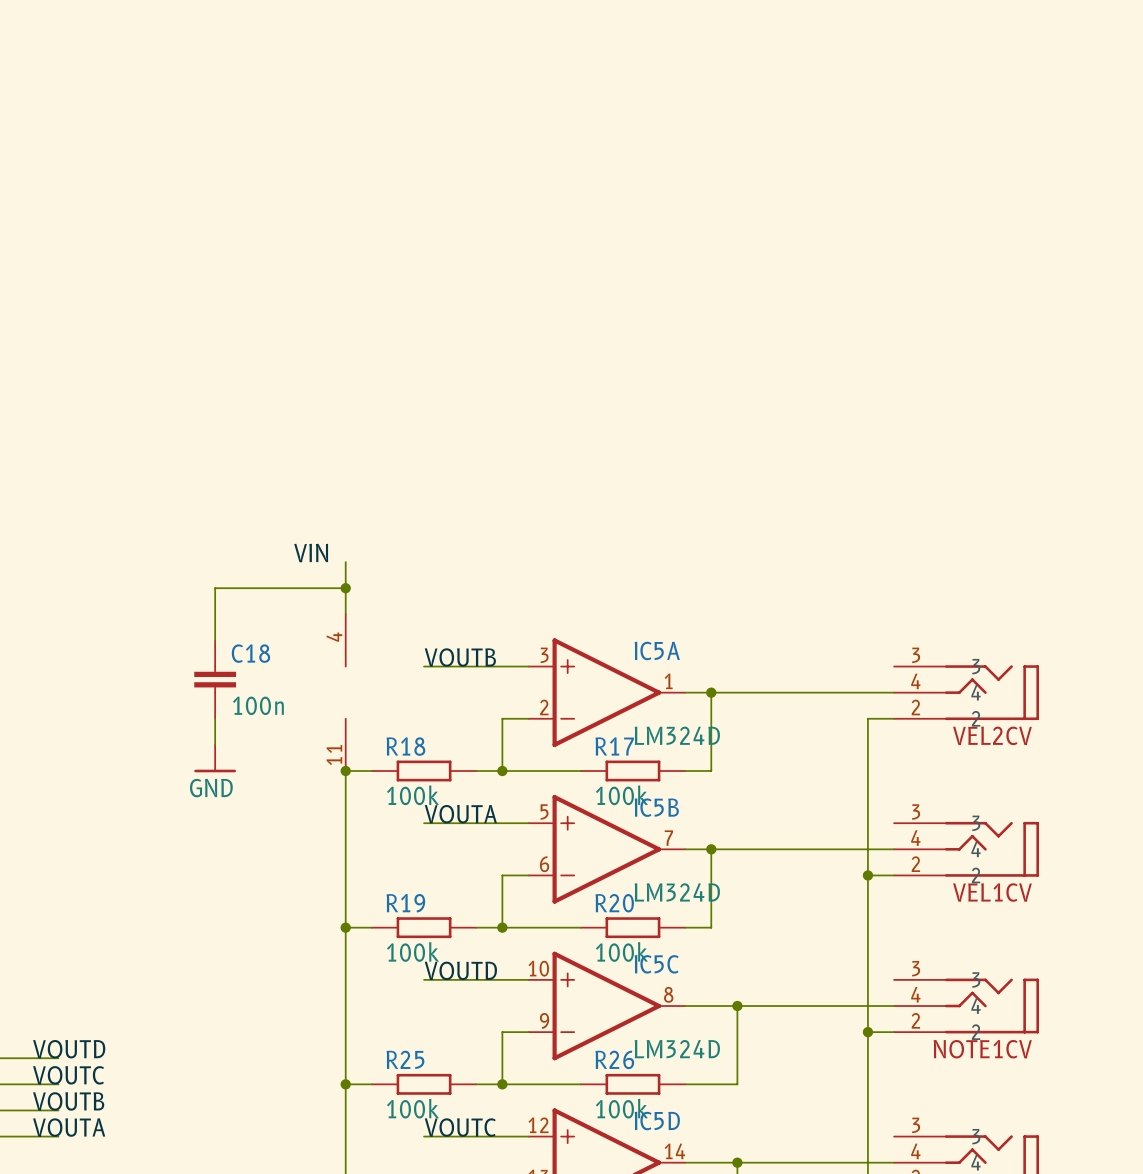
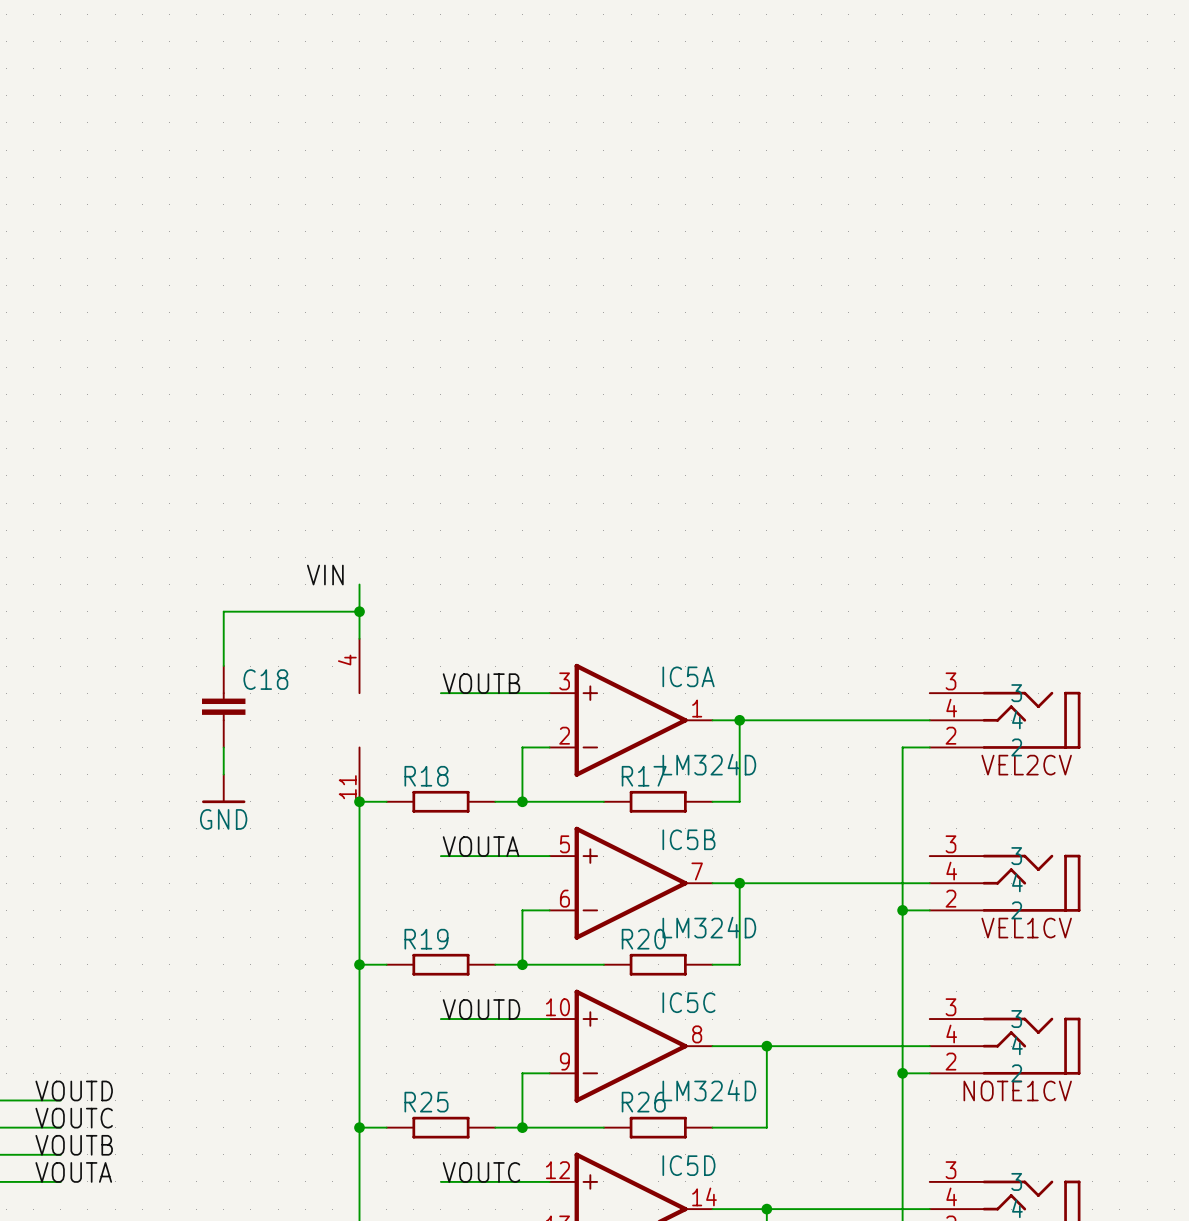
C18 value: 100n (258, 705) -> none
R18 value: 100k (413, 795) -> none
R17 value: 100k (621, 795) -> none
R19 value: 100k (413, 951) -> none
R20 value: 100k (621, 951) -> none
R25 value: 100k (413, 1108) -> none
R26 value: 100k (621, 1108) -> none

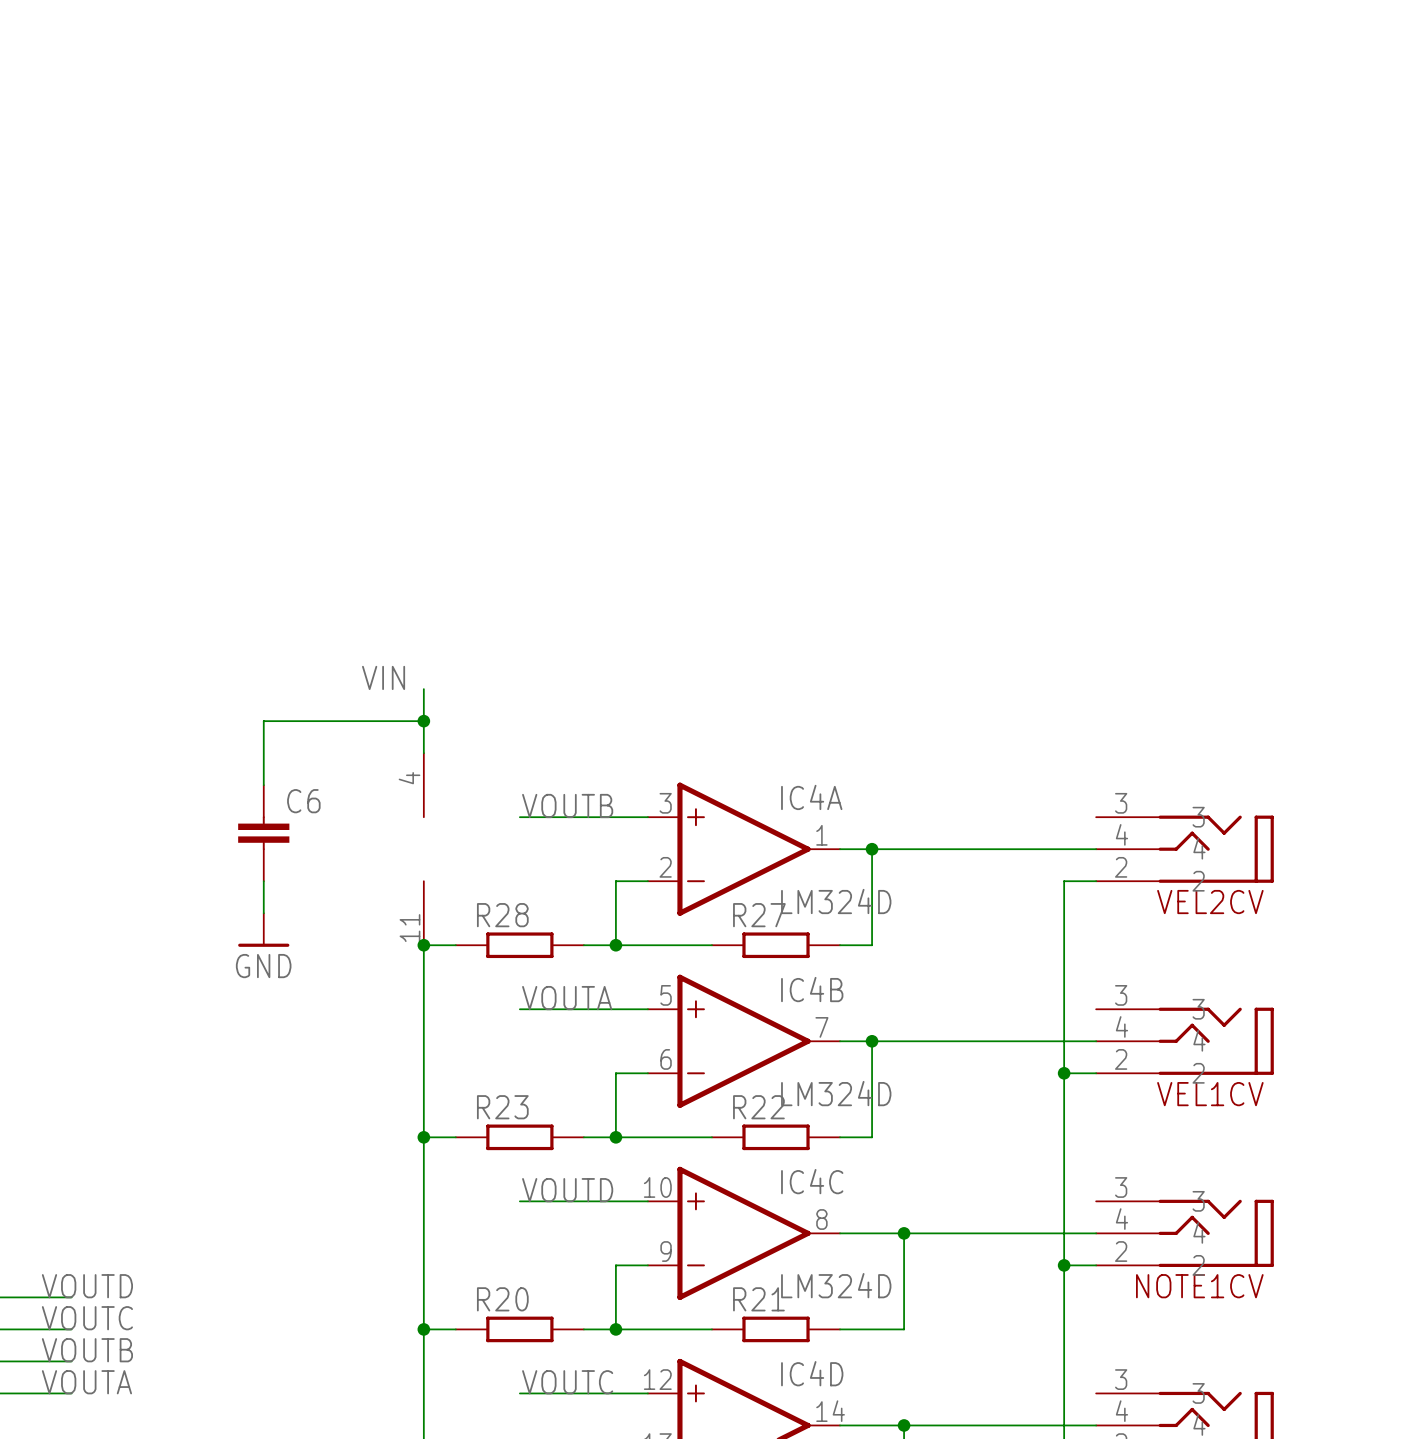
IC5A name: IC5A (688, 676) -> IC4A (811, 797)
C18 name: C18 (265, 679) -> C6 (303, 801)
R18 name: R18 (426, 776) -> R28 (502, 915)
R17 name: R17 (644, 776) -> R27 (759, 915)
IC5B name: IC5B (688, 839) -> IC4B (812, 989)
R19 name: R19 (426, 939) -> R23 (502, 1107)
R20 name: R20 (643, 939) -> R22 (758, 1107)
IC5C name: IC5C (688, 1002) -> IC4C (812, 1181)
R25 name: R25 (426, 1102) -> R20 (502, 1299)
R26 name: R26 (643, 1102) -> R21 (758, 1299)
IC5D name: IC5D (688, 1165) -> IC4D (812, 1373)

